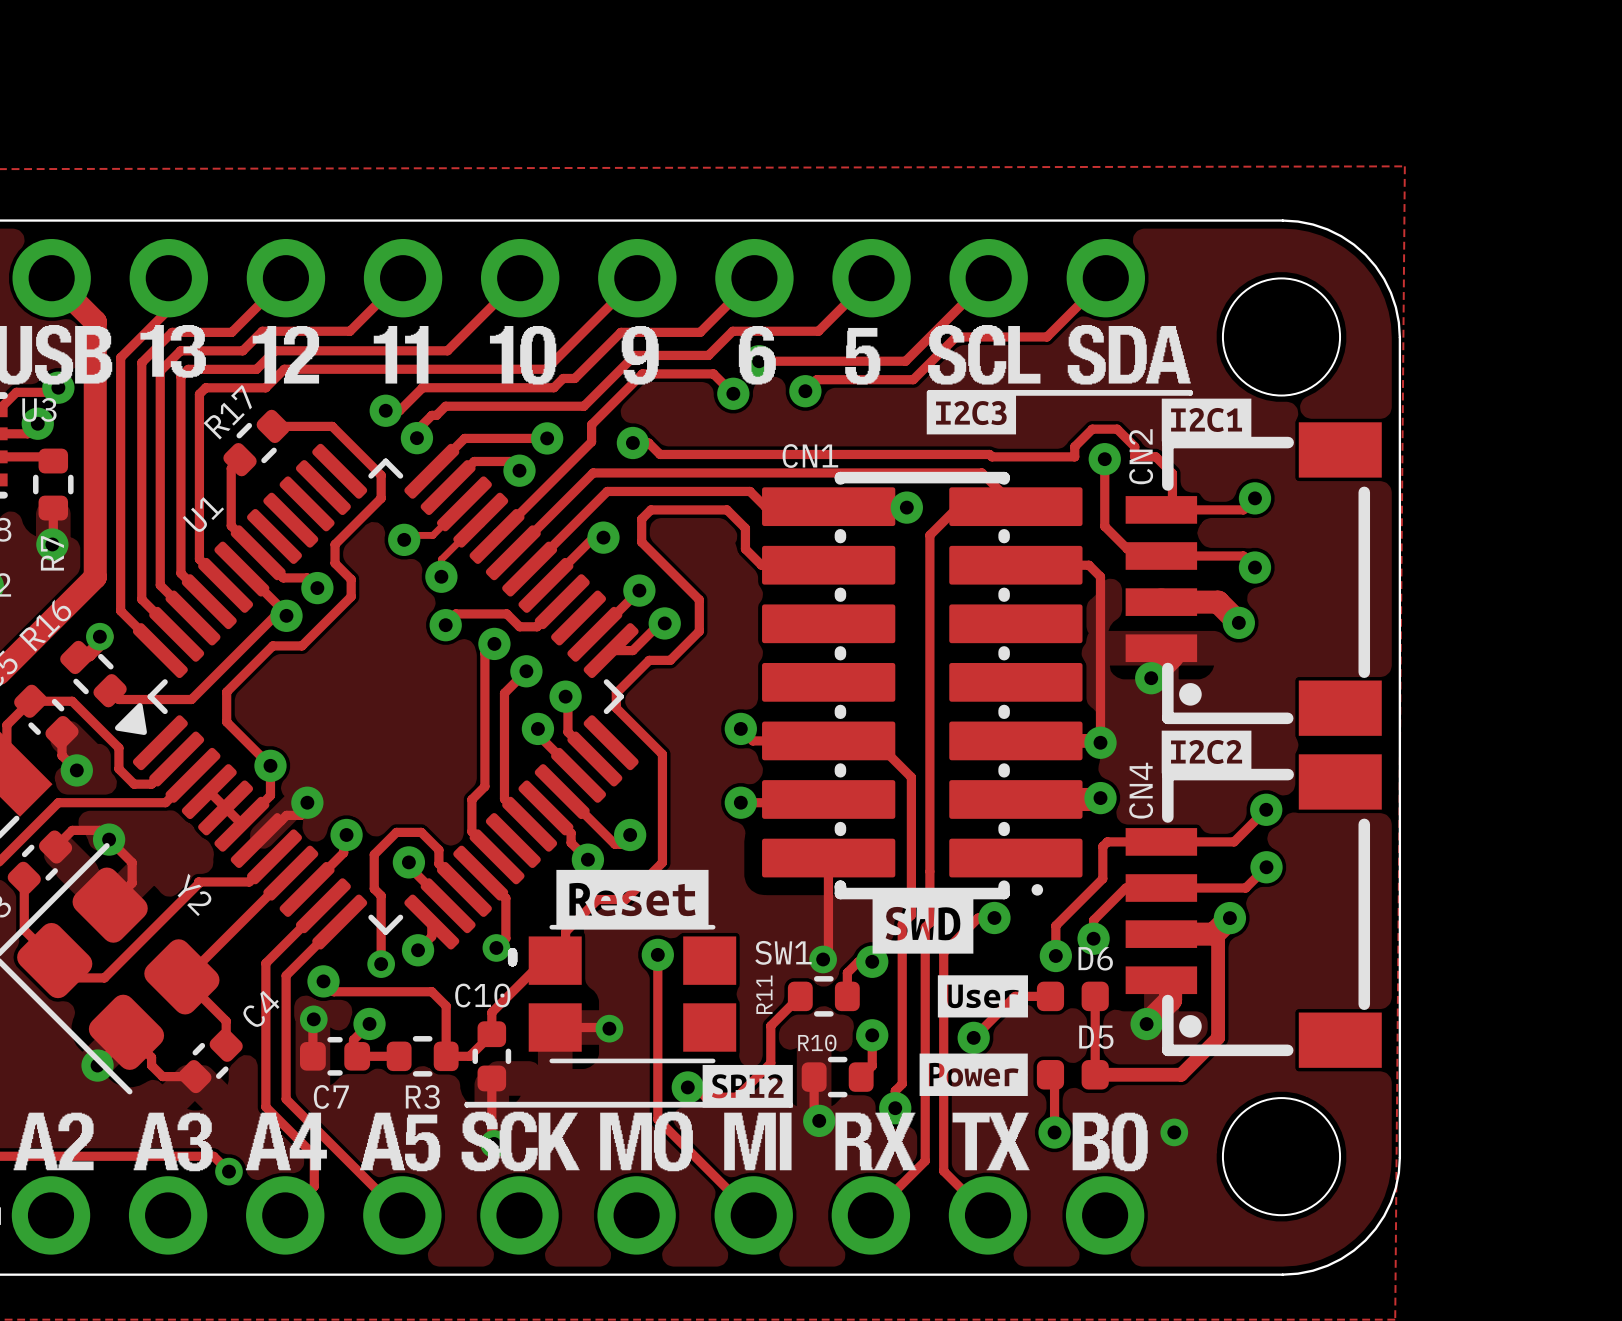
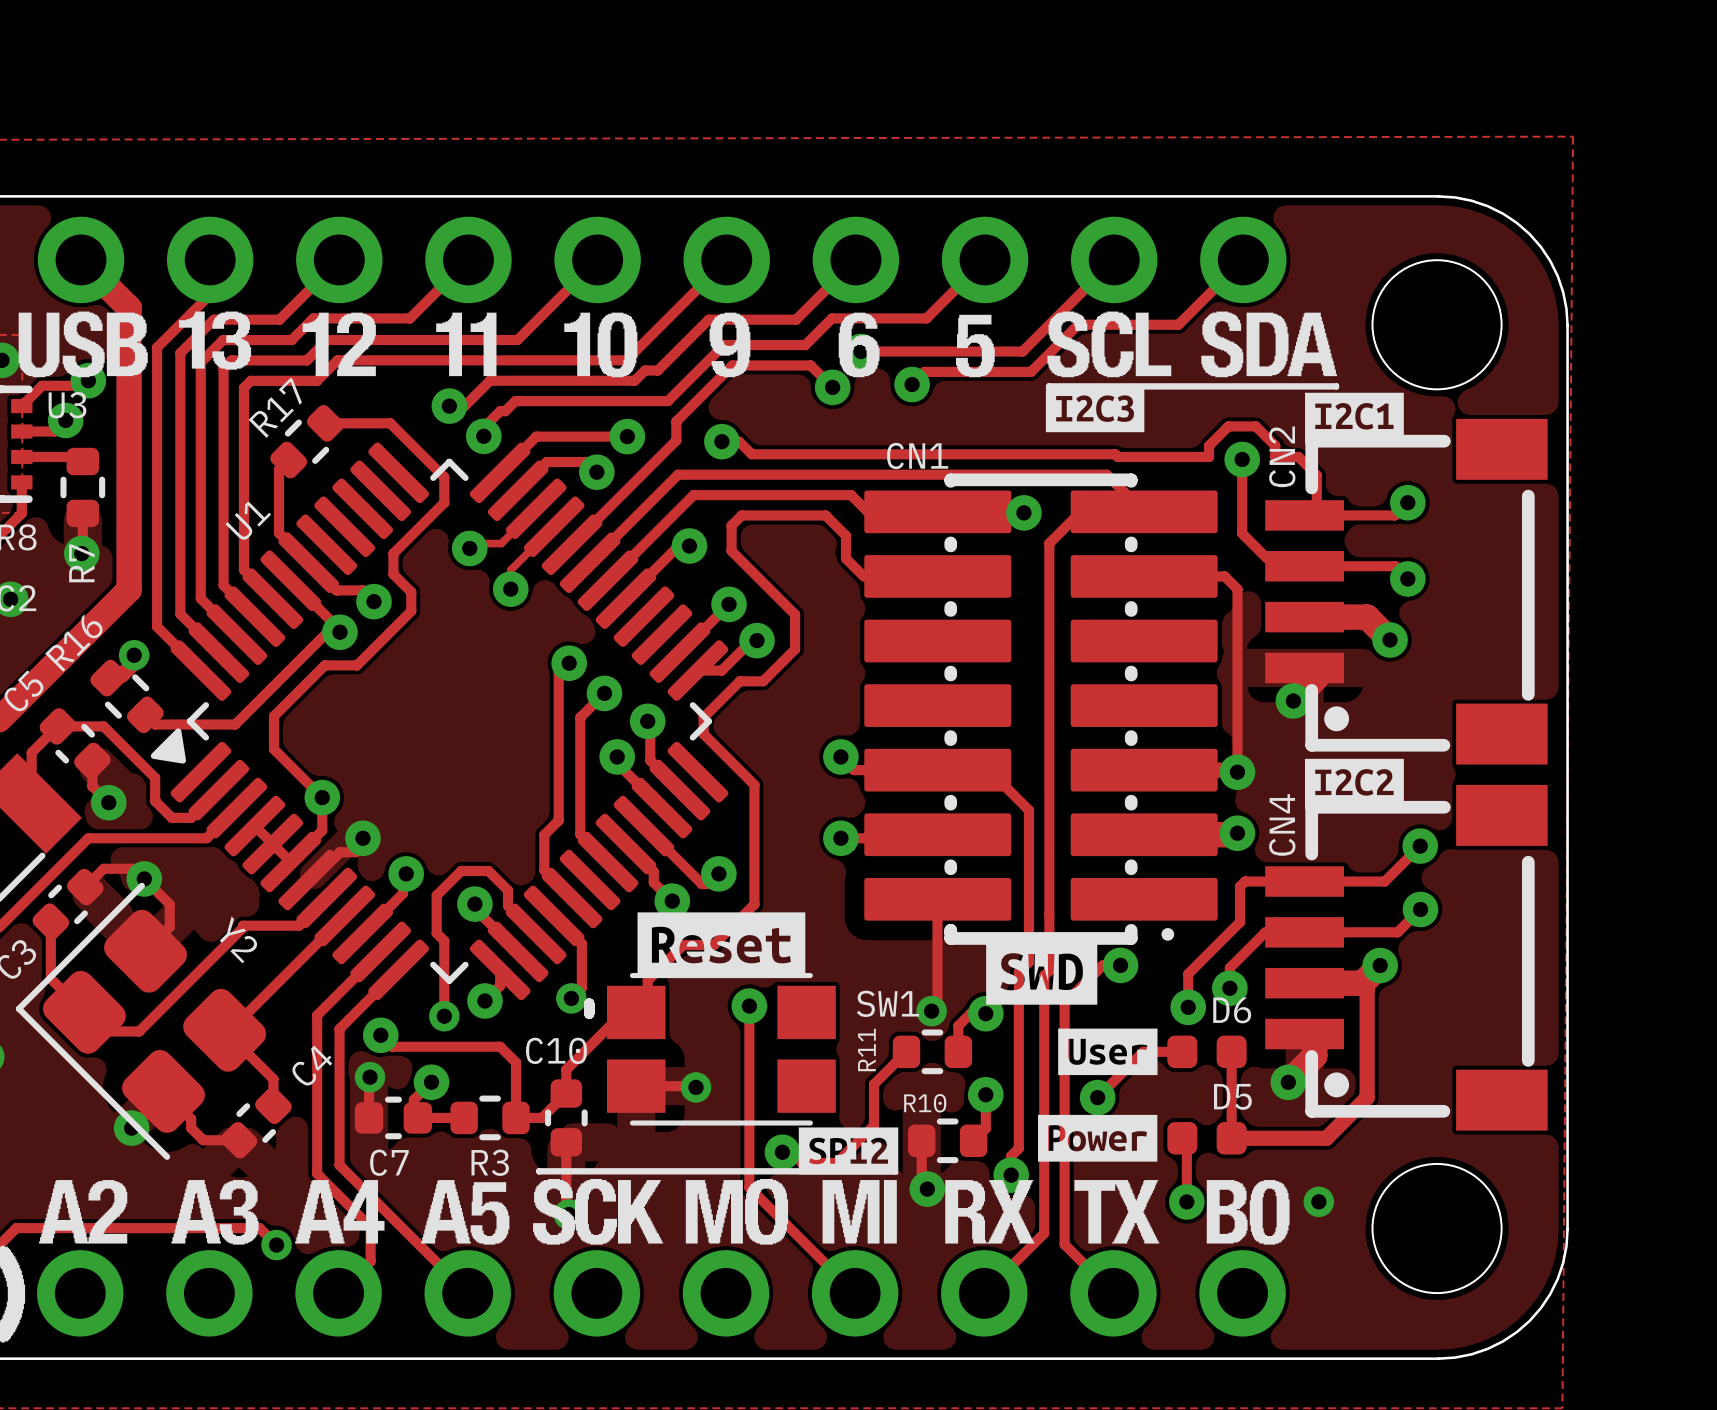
track: (562, 601) (537, 626) (519, 626) (506, 613) (455, 613) (445, 624) -> none
via: (445, 625) -> none

